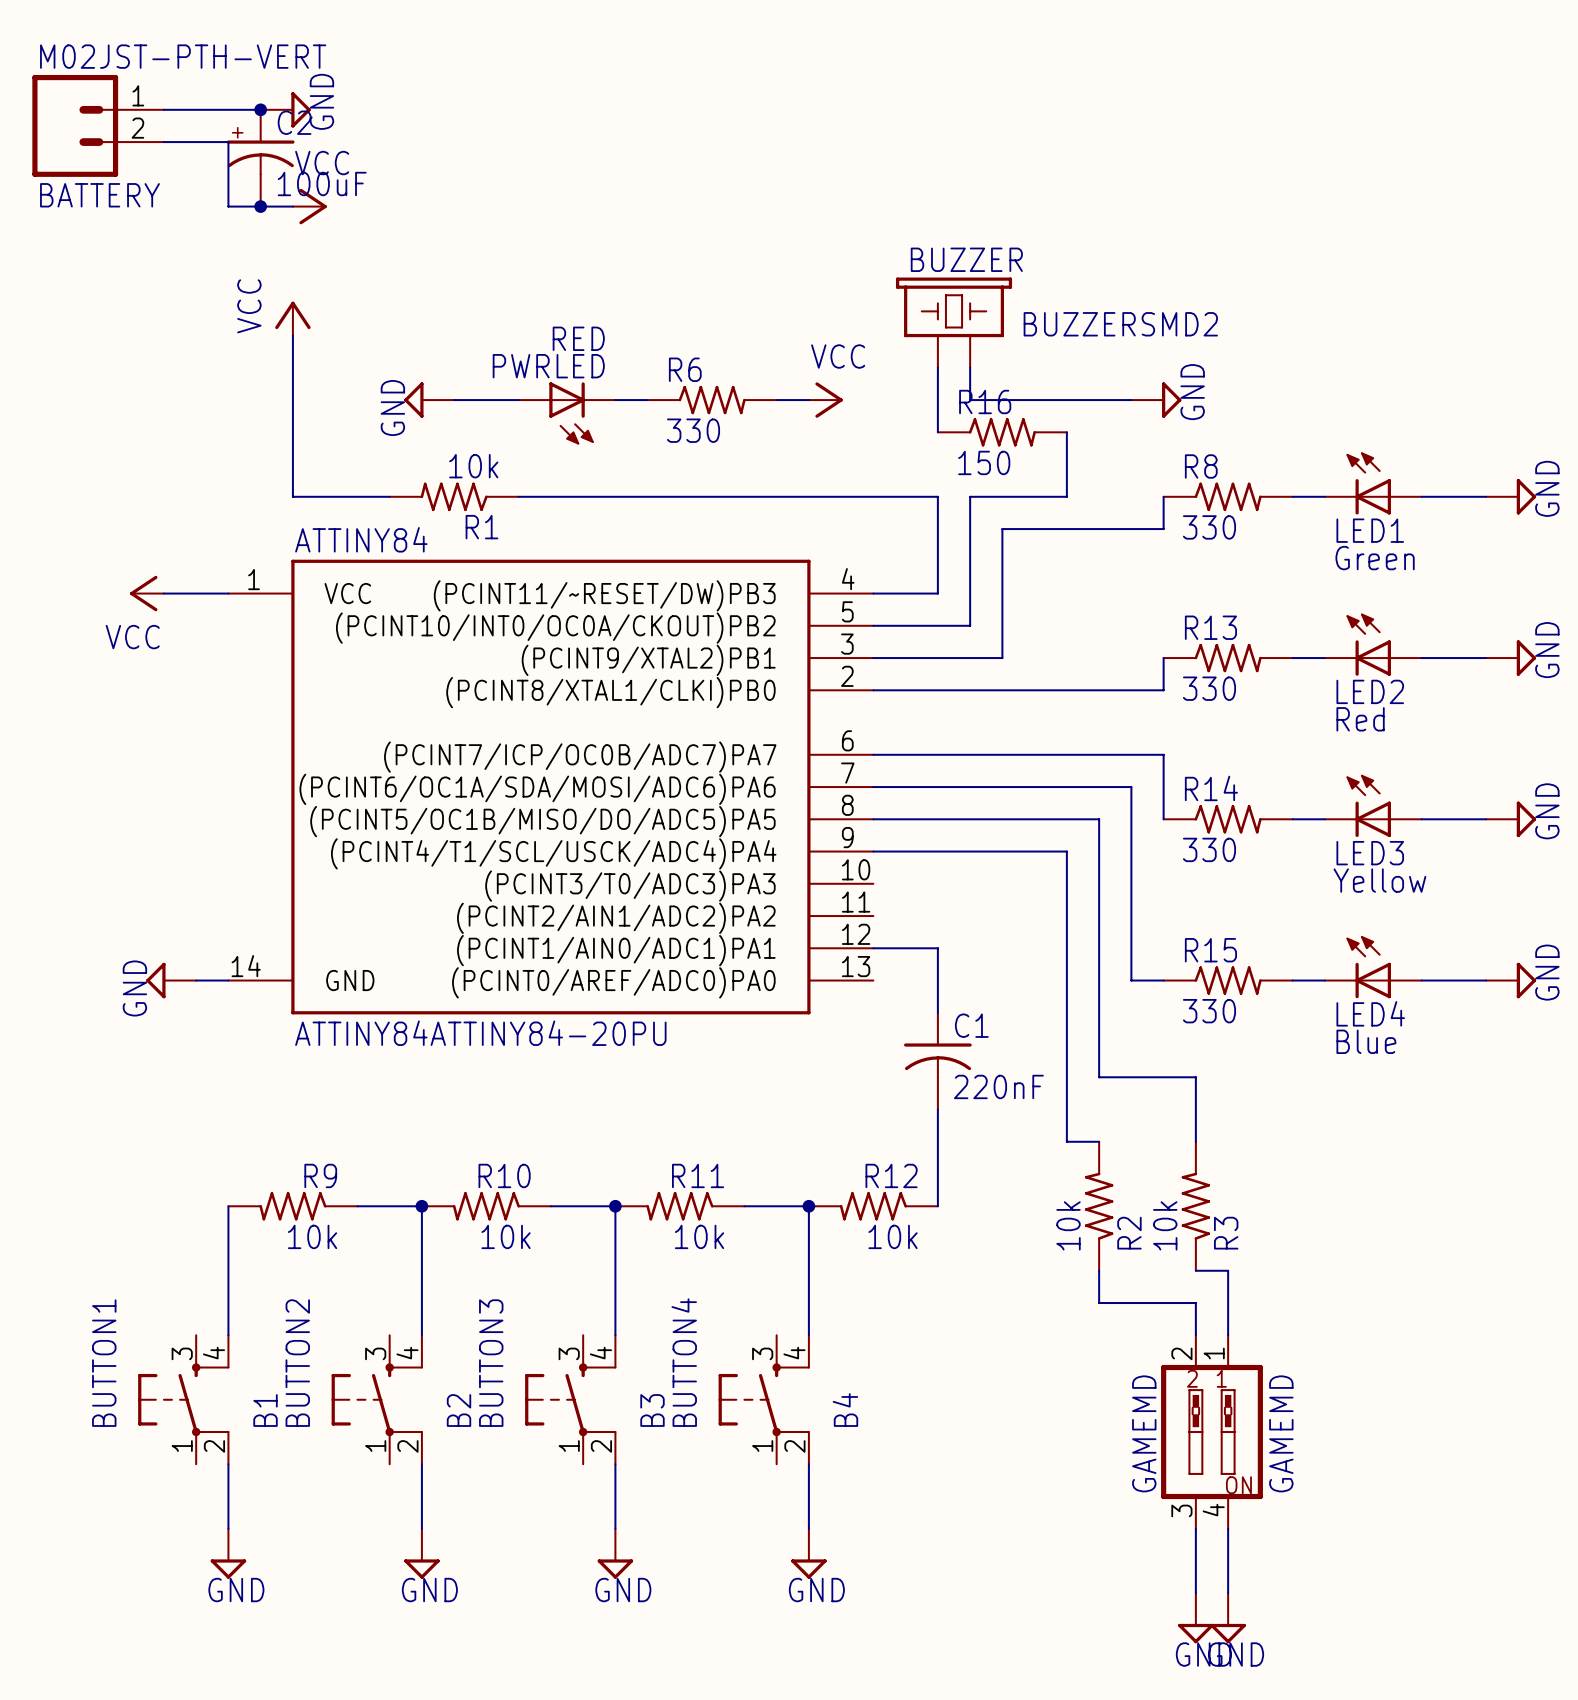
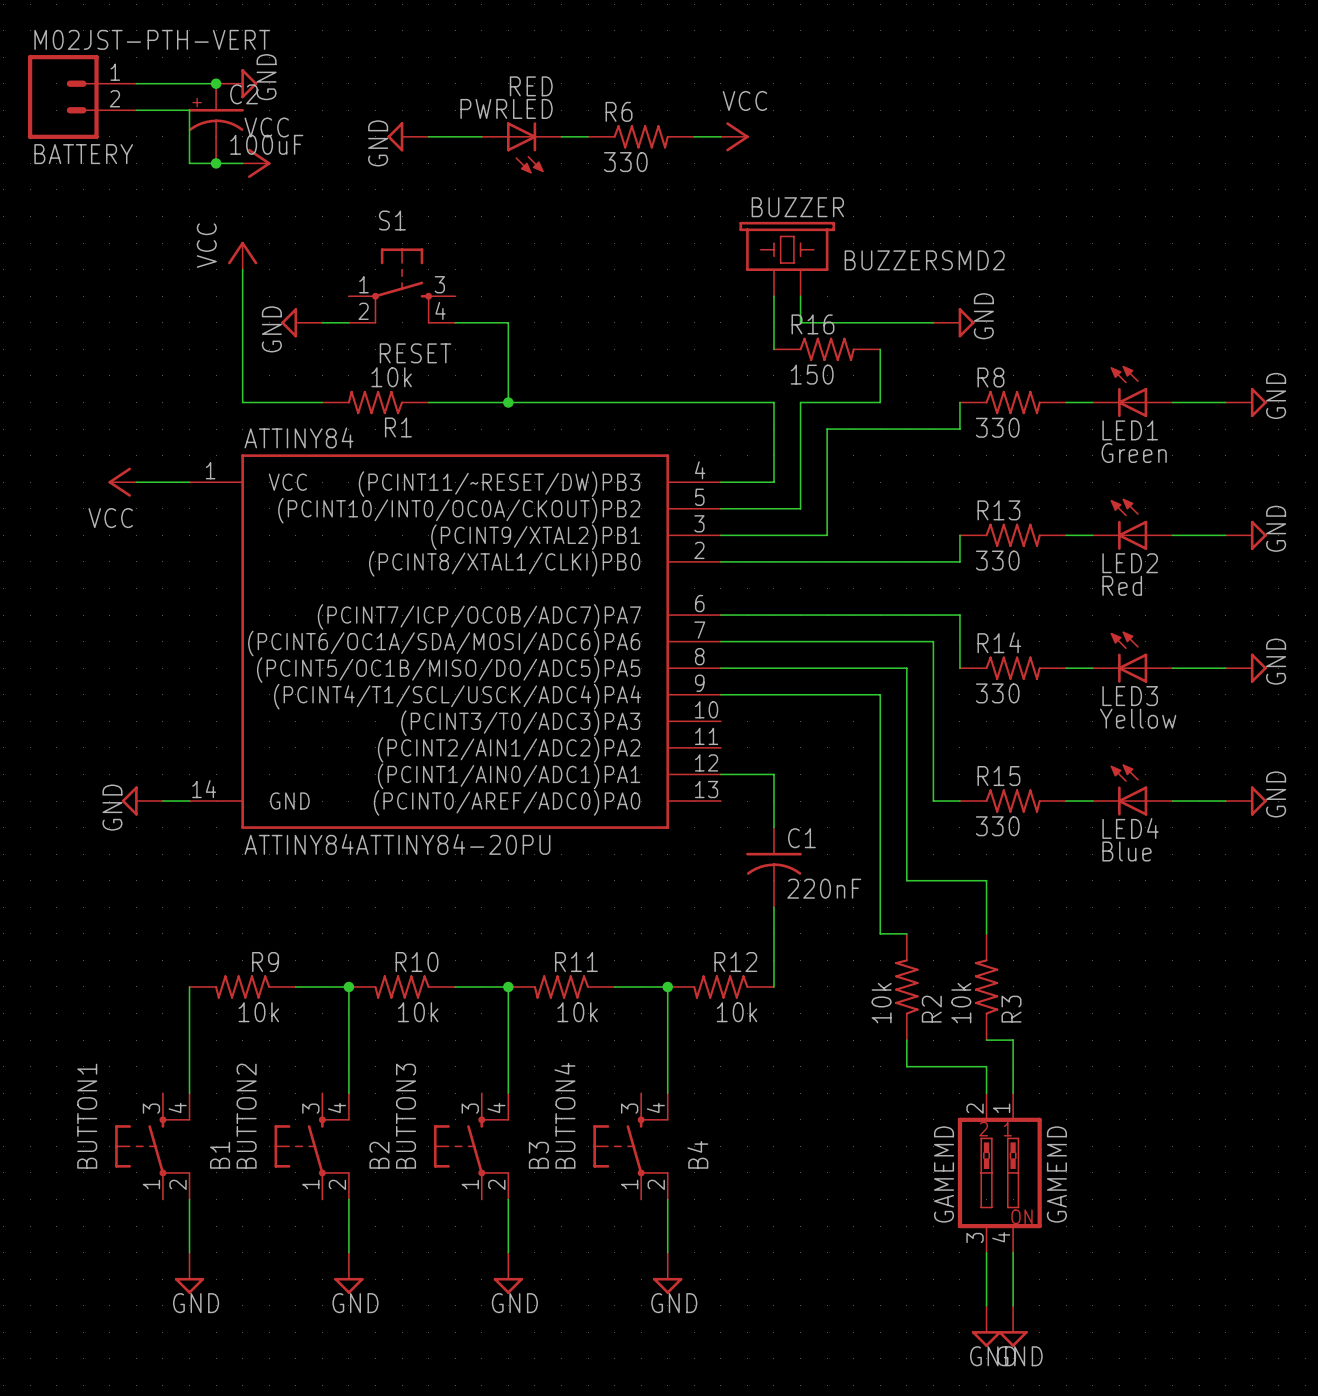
power symbol: none -> GND (408, 136)
wire: none -> (561, 136) (588, 136)
S1: none -> RESET (402, 286)
power symbol position: GND (429, 400) -> GND (301, 322)
wire: (454, 400) (518, 400) -> (428, 136) (481, 136)
wire: none -> (455, 322) (508, 322) (508, 402)
wire: (615, 400) (647, 400) -> (322, 322) (348, 322)
R6 position: (712, 400) -> (641, 136)
wire: (776, 400) (808, 400) -> (694, 136) (720, 136)
power symbol position: VCC (825, 400) -> VCC (734, 136)
PWRLED position: (567, 413) -> (521, 147)
junction: none -> (508, 402)

